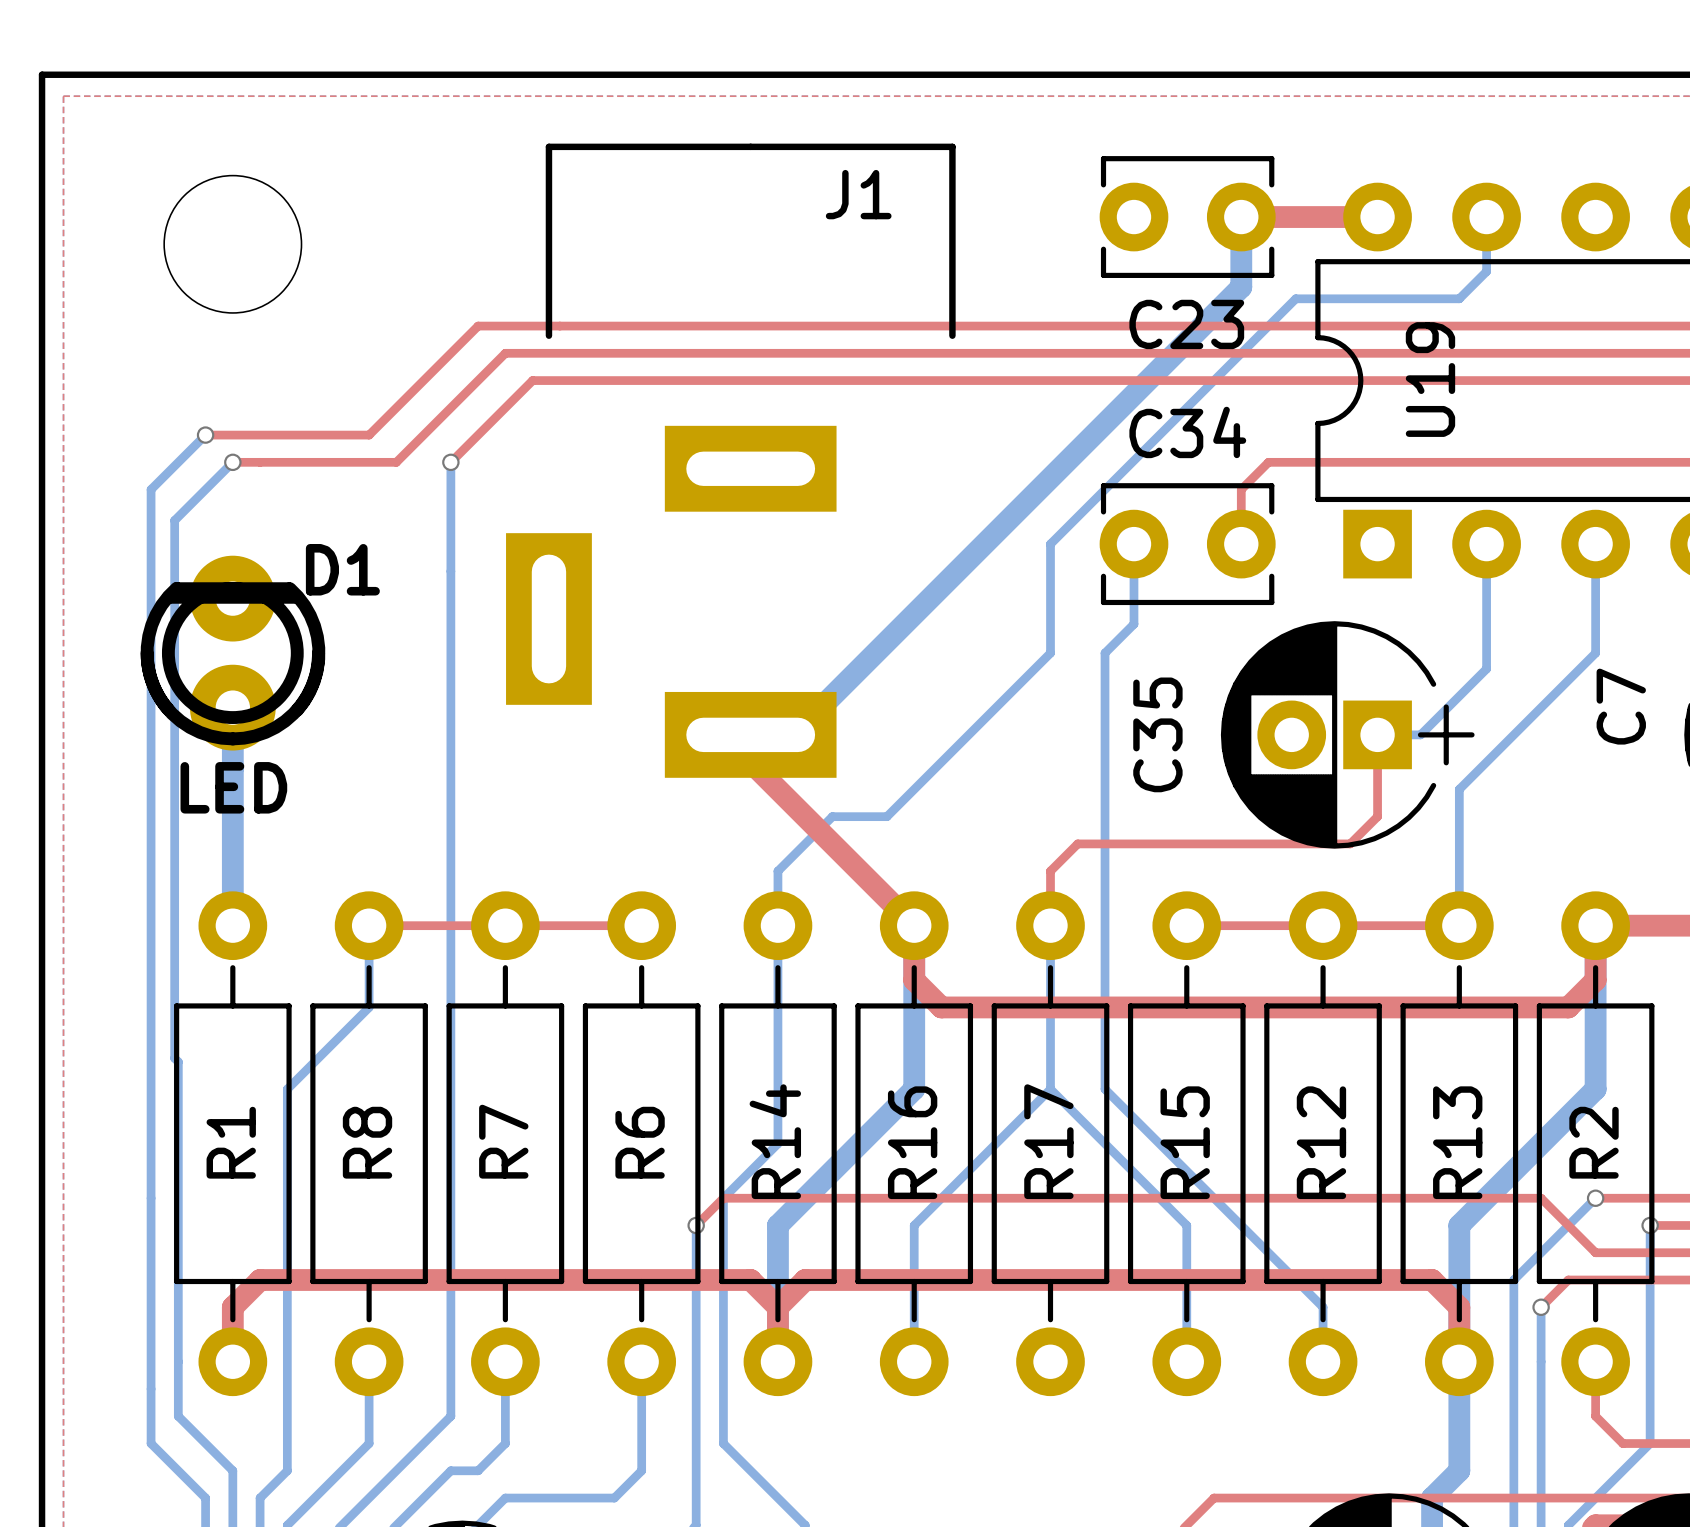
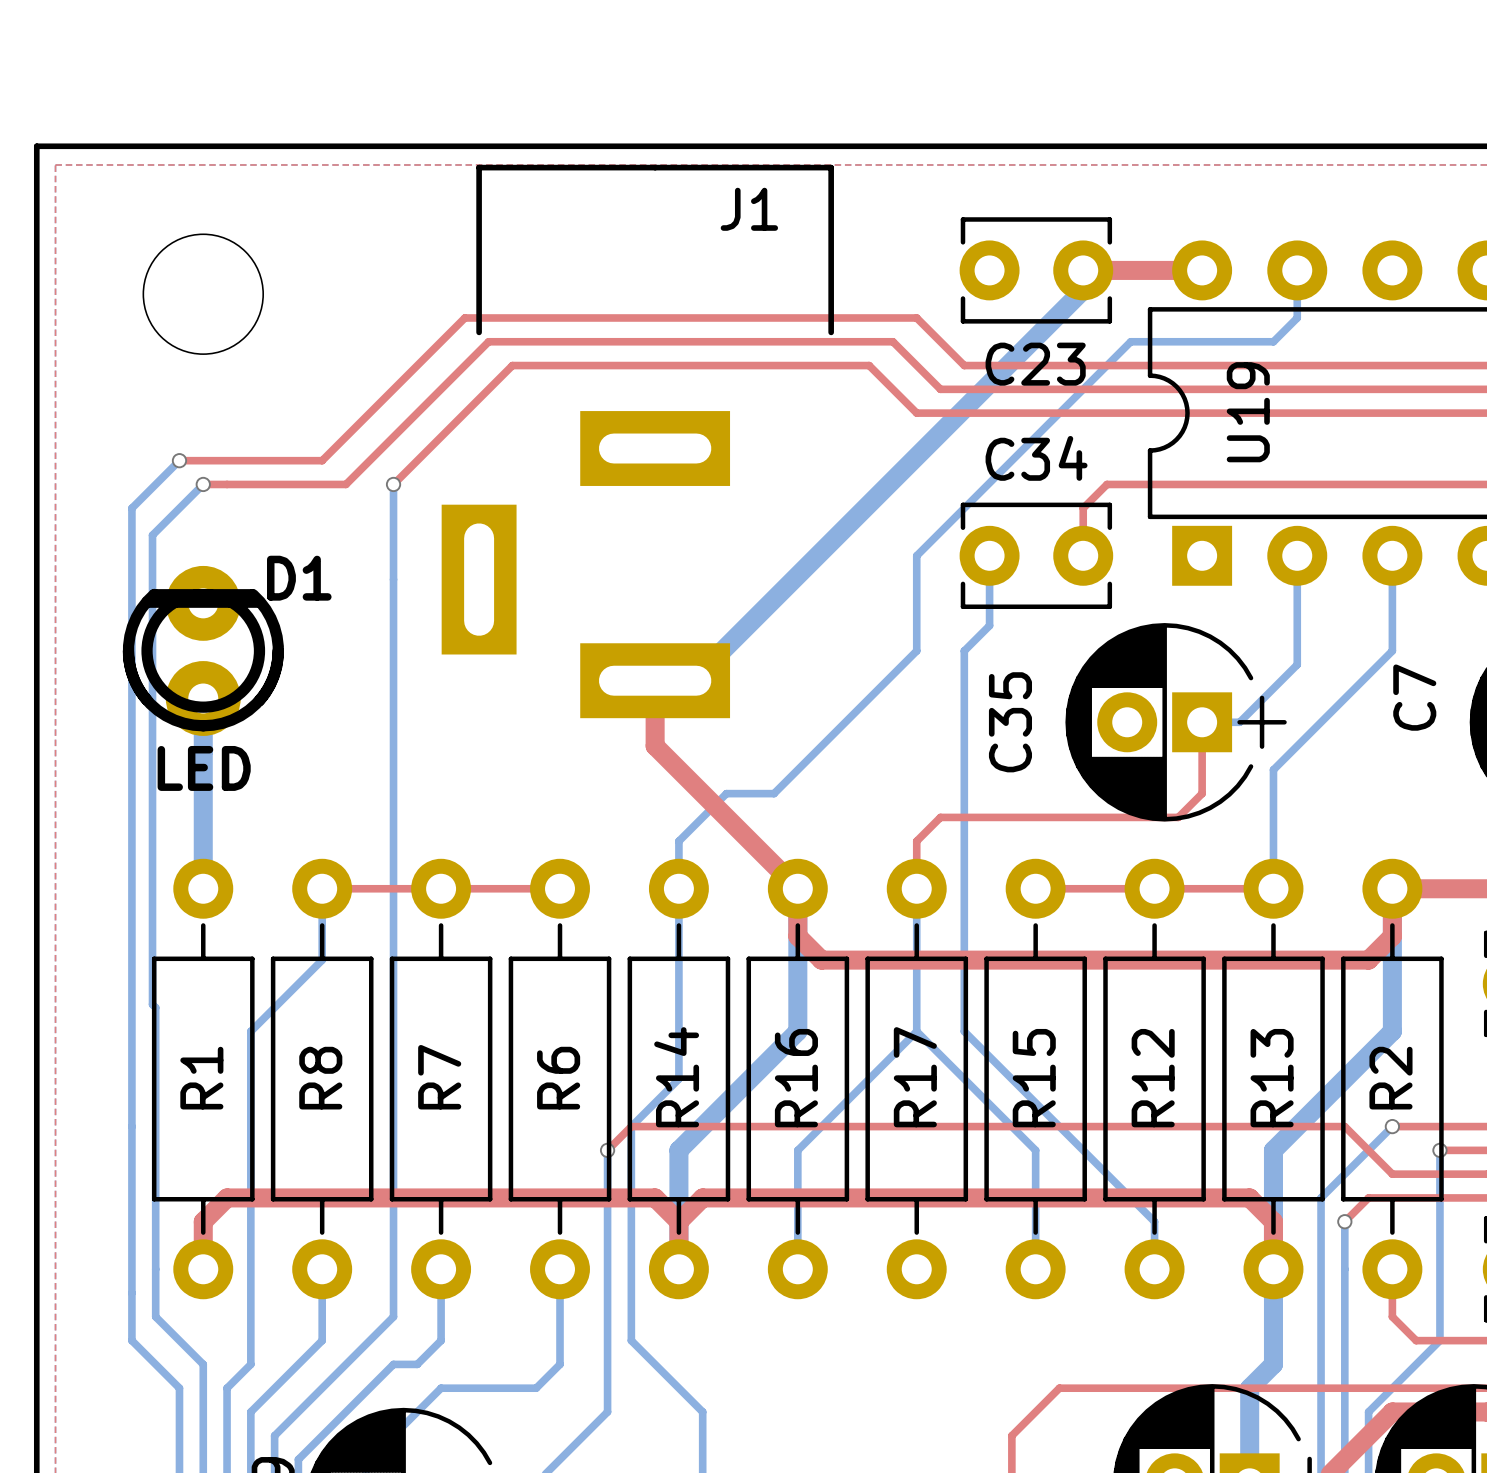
bottom track: (1241, 239) (1241, 287) (793, 734) (750, 734) -> (1083, 290) (692, 680) (655, 680)
top track: (478, 326) (587, 326) -> (464, 413) (512, 365)
top track: none -> (417, 365) (464, 317) (916, 317) (964, 365)
top track: (995, 326) (1105, 326) -> (869, 365) (916, 413)
top track: (505, 353) (1077, 353) -> (441, 389) (488, 341) (892, 341) (940, 389)
top track: (532, 380) (1050, 380) -> none
J1 position: (730, 460) -> (637, 441)

